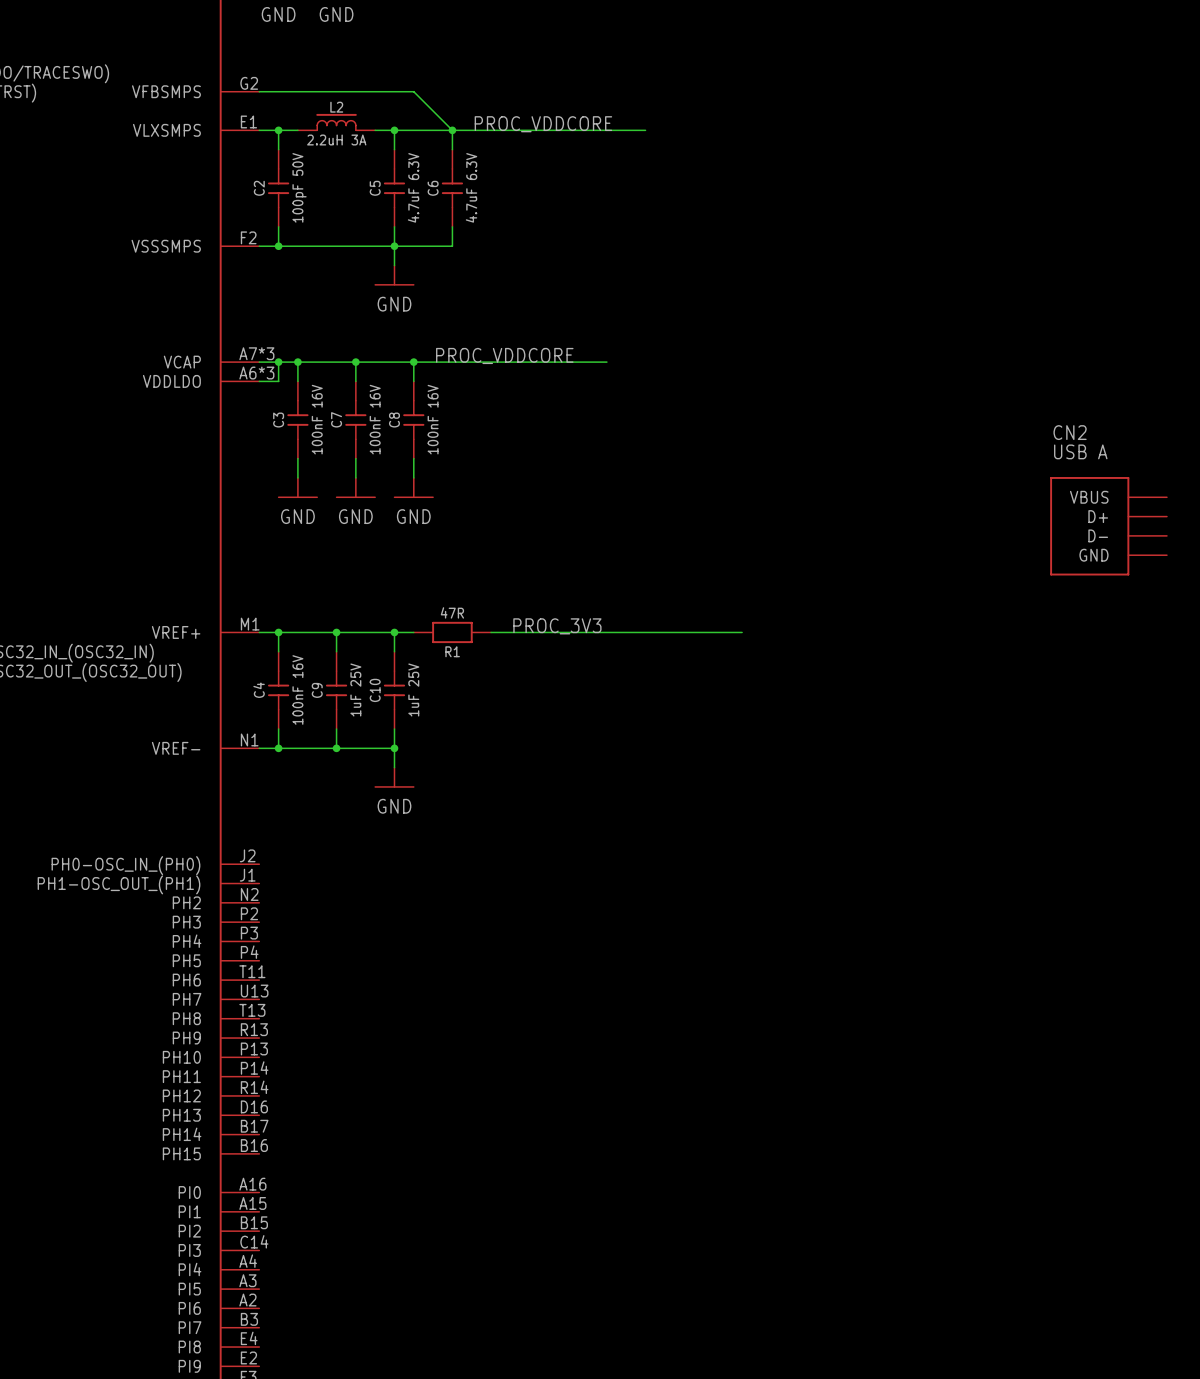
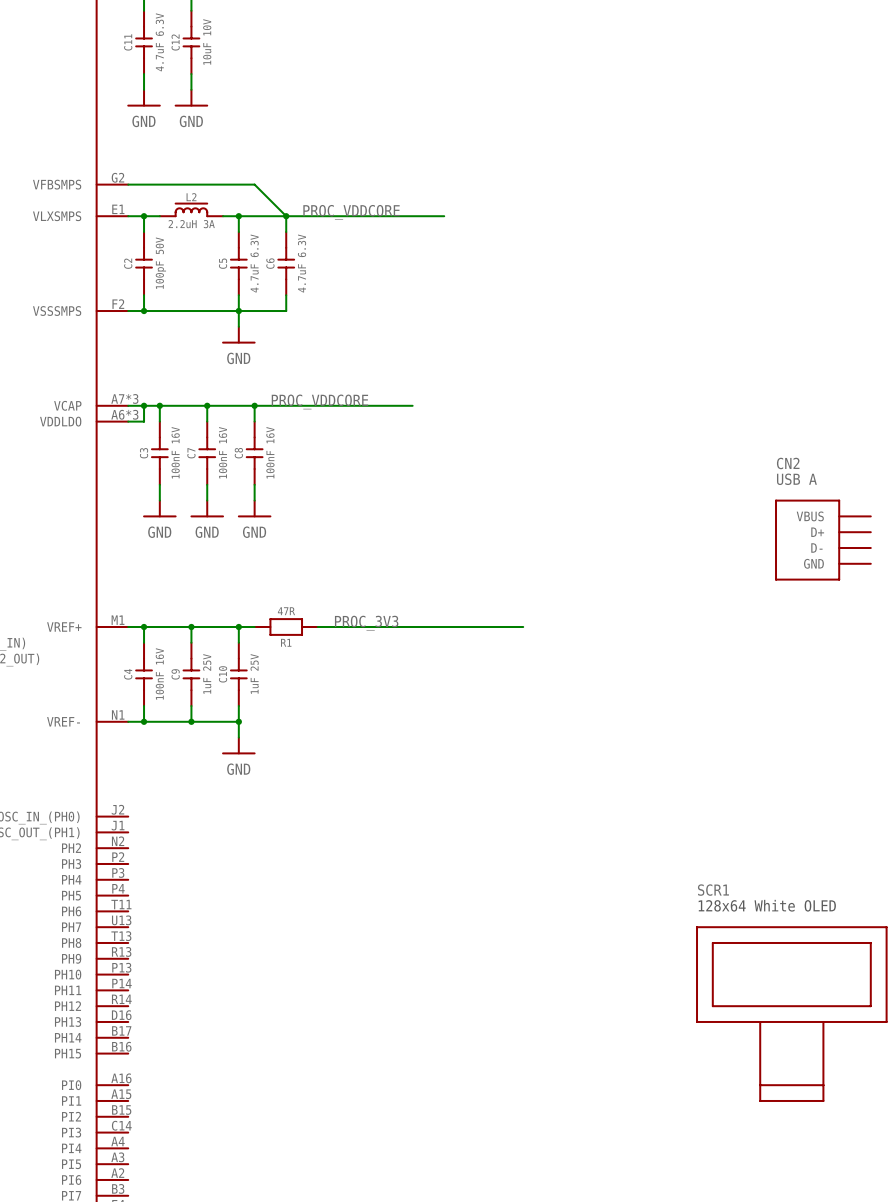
SCR1: none -> 128x64 White OLED (791, 1014)

